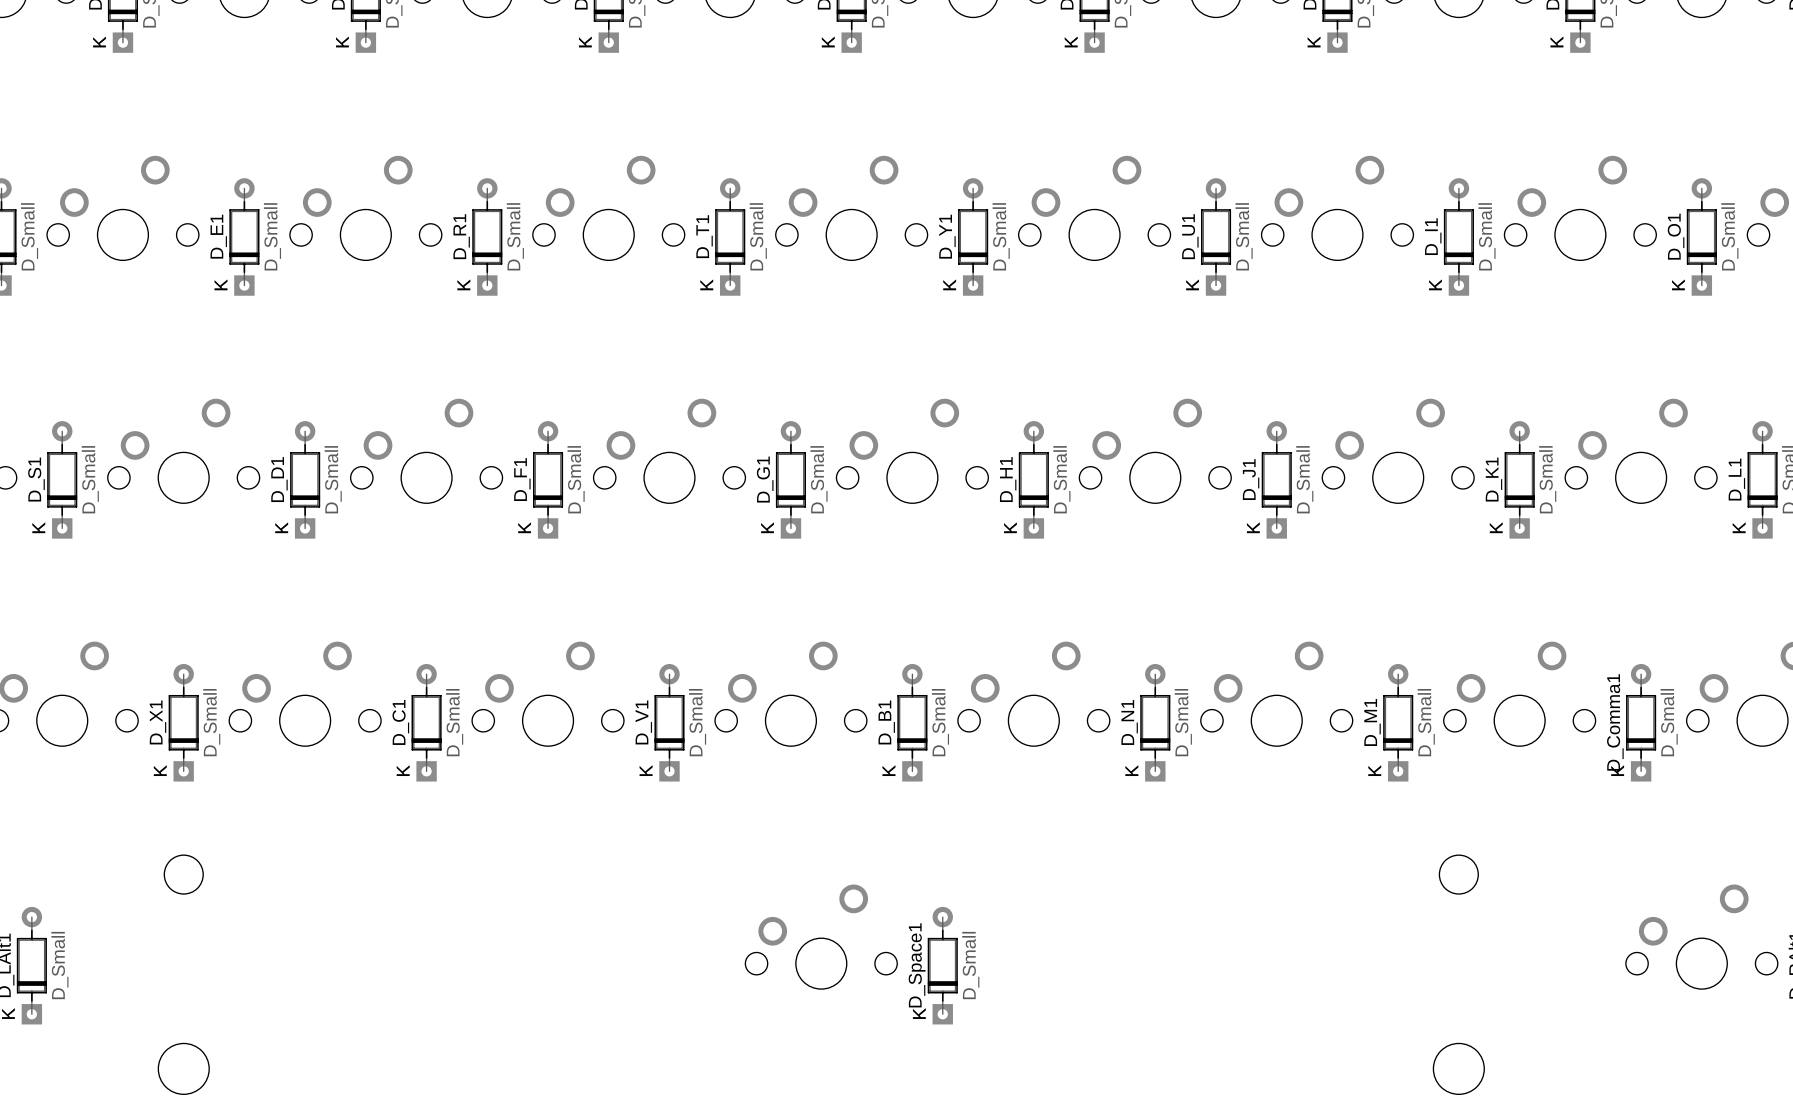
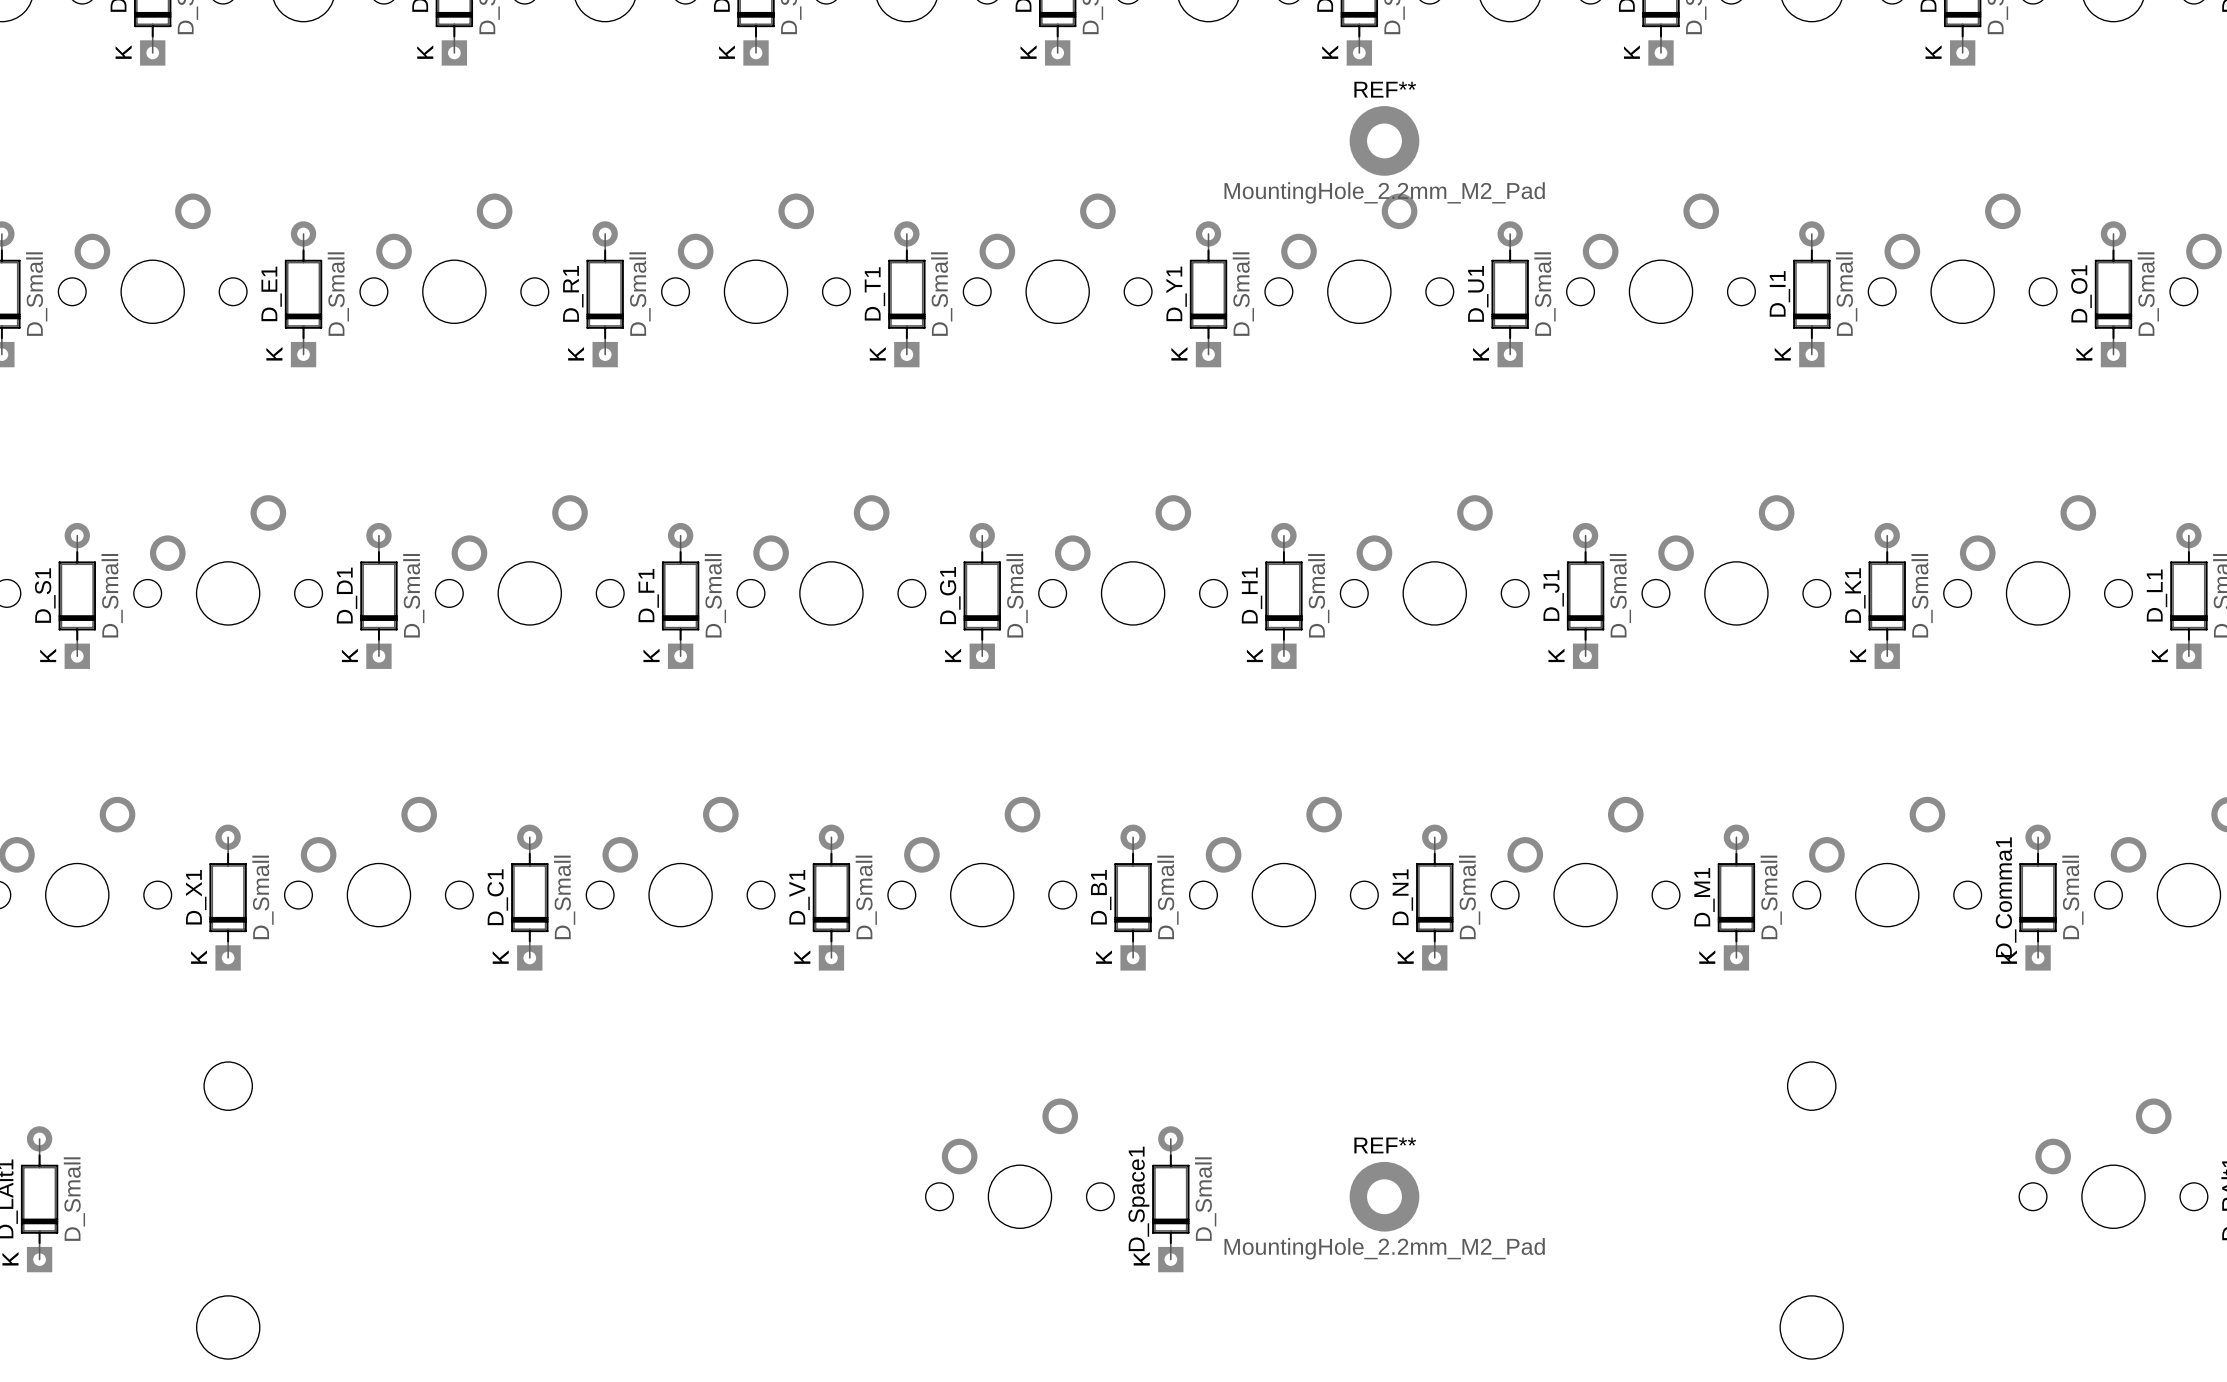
REF**: none -> MountingHole_2.2mm_M2_Pad (1384, 140)
REF**: none -> MountingHole_2.2mm_M2_Pad (1384, 1196)

